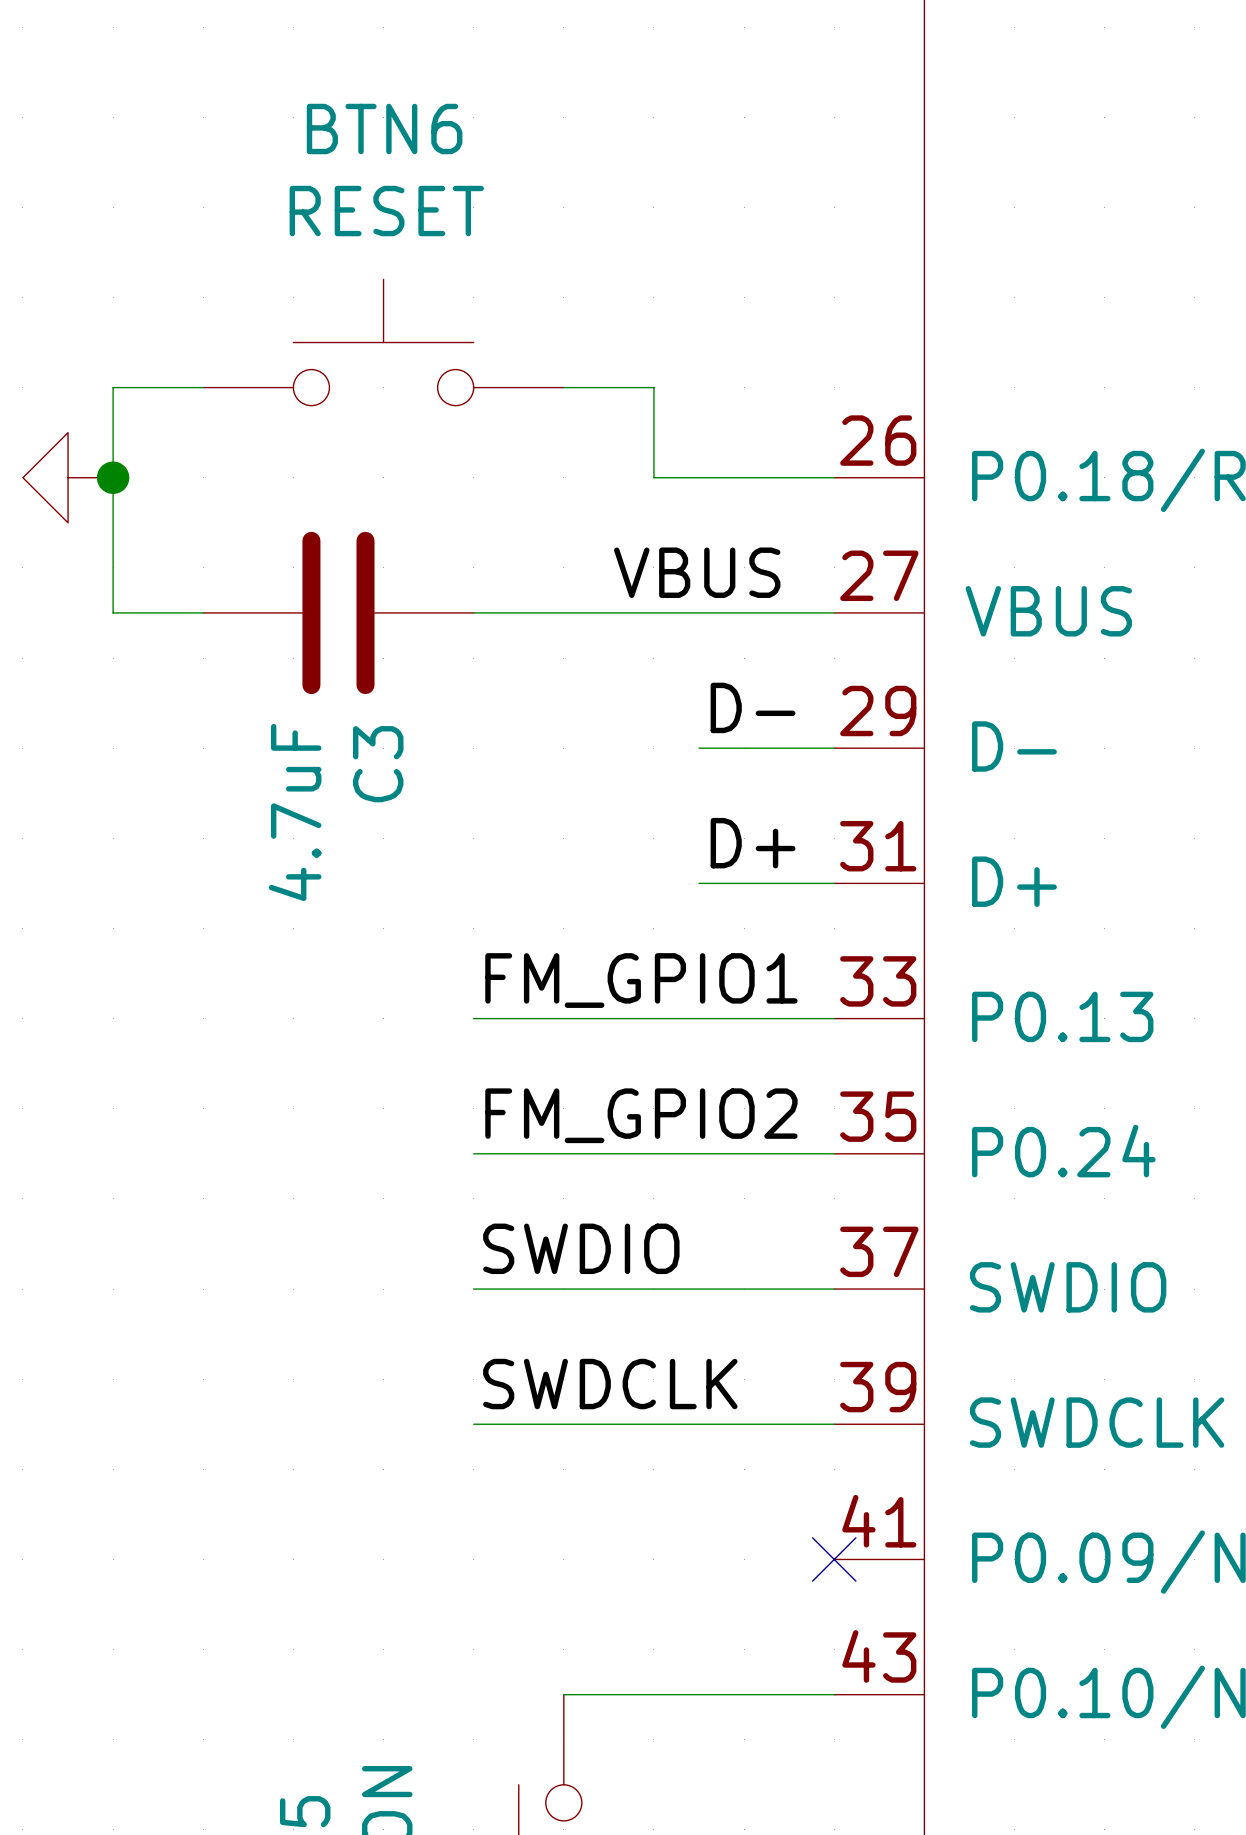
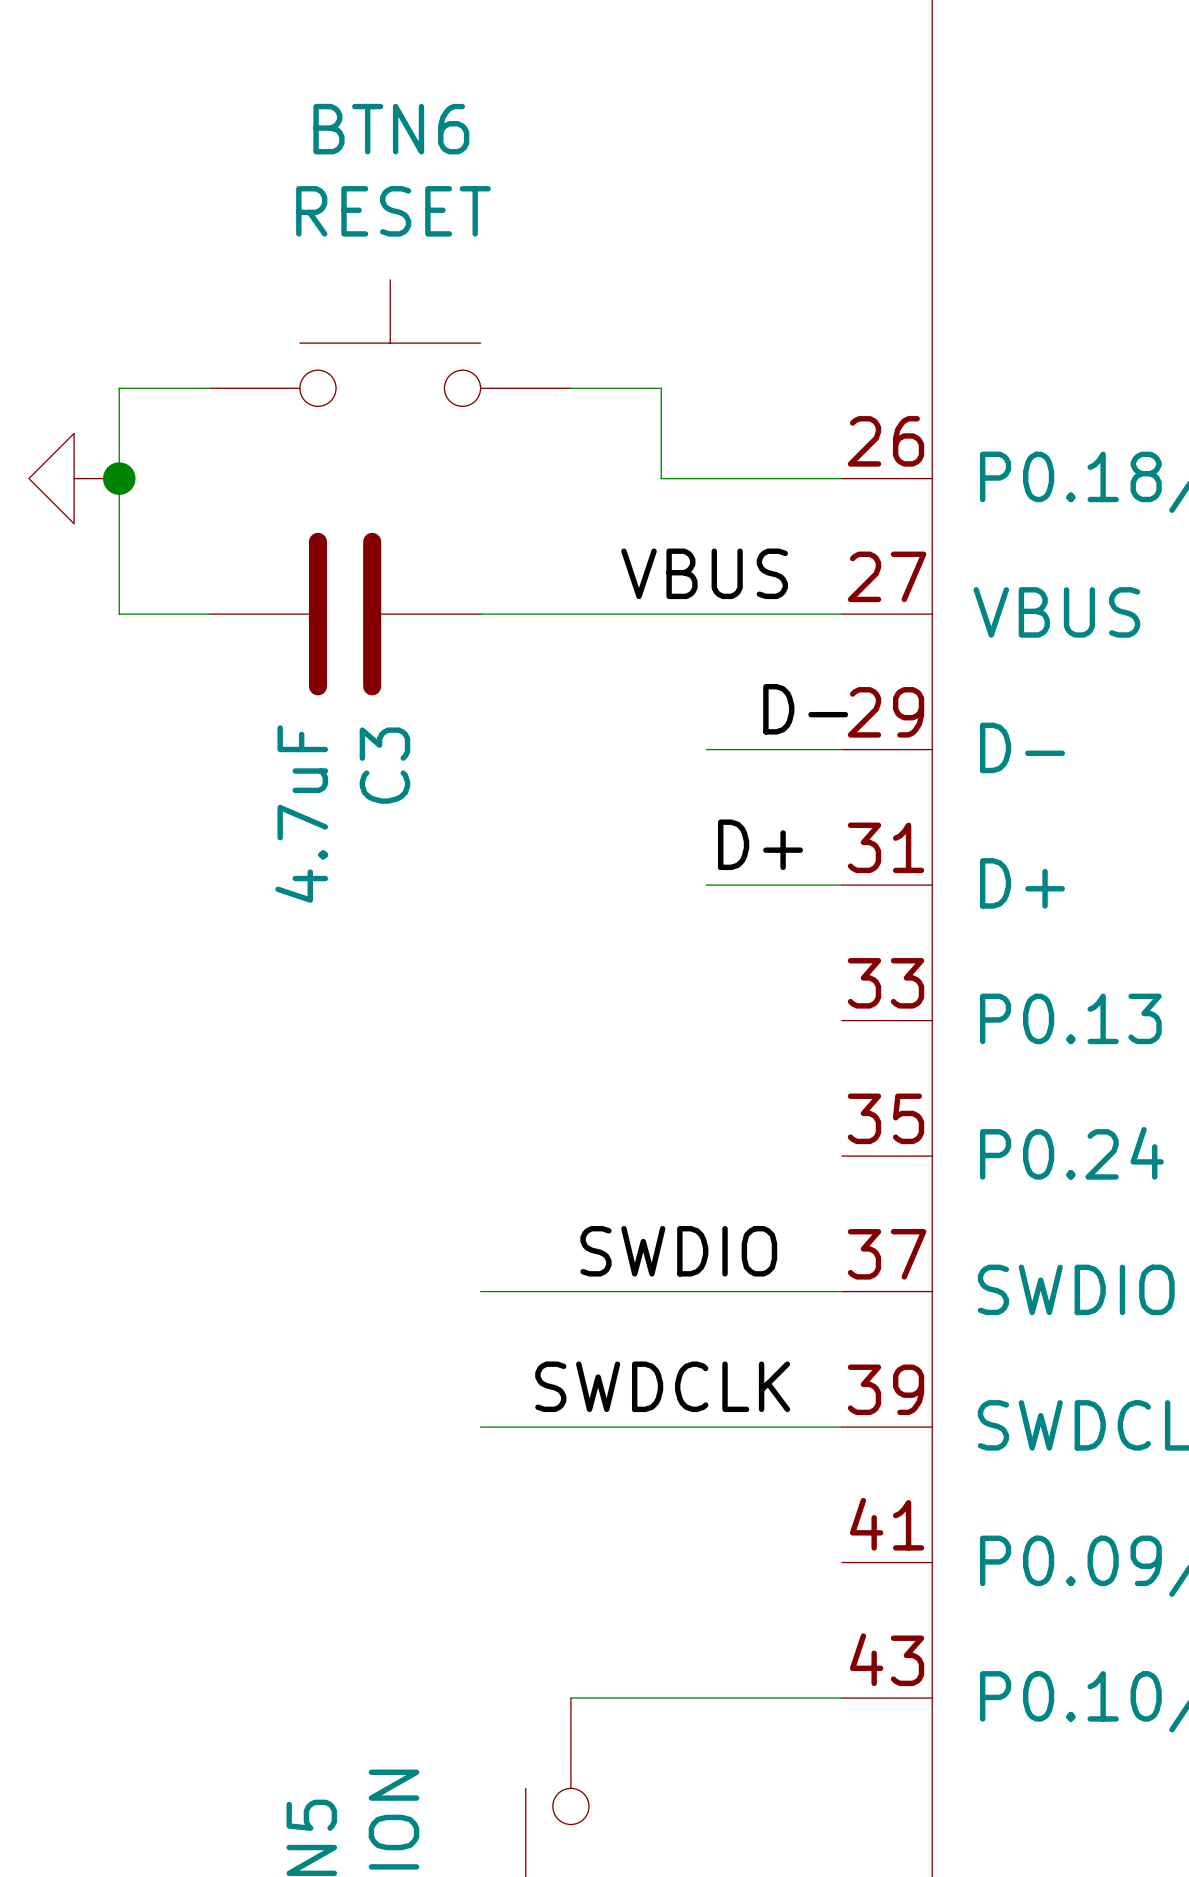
label position: D- (753, 707) -> D- (805, 709)
label: FM_GPIO1 (641, 980) -> none
wire: (473, 1018) (834, 1018) -> none
label: FM_GPIO2 (641, 1115) -> none
wire: (473, 1153) (834, 1153) -> none
label position: SWDIO (581, 1248) -> SWDIO (678, 1251)
label position: SWDCLK (610, 1384) -> SWDCLK (662, 1386)
no-connect mark: (834, 1559) -> none

